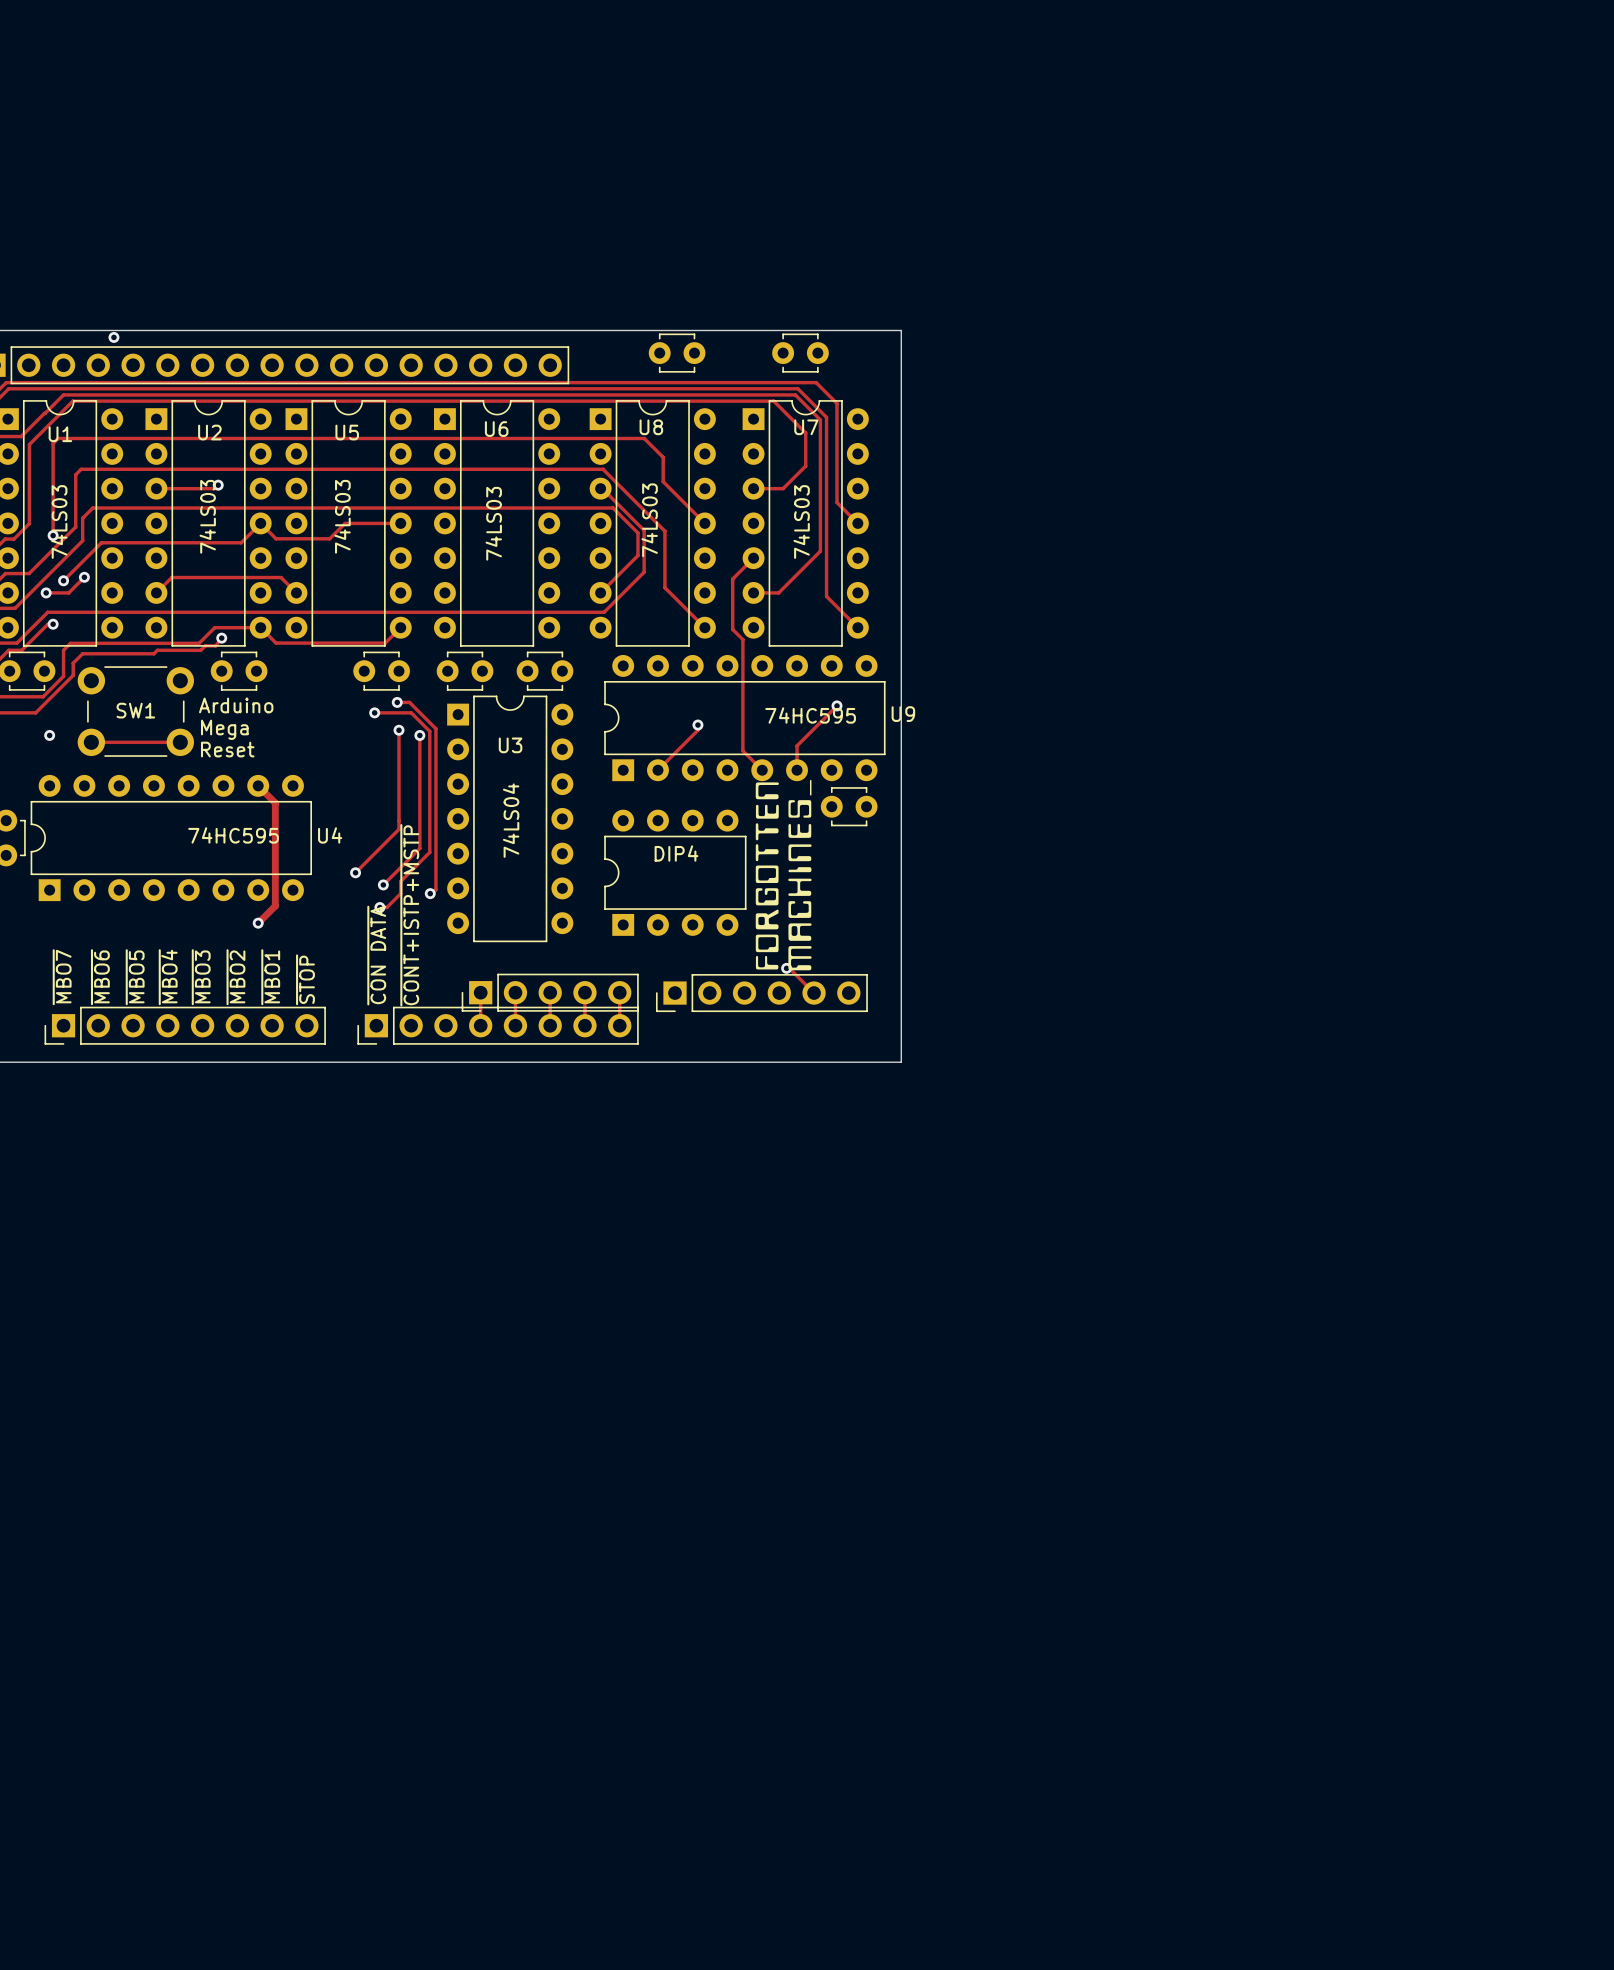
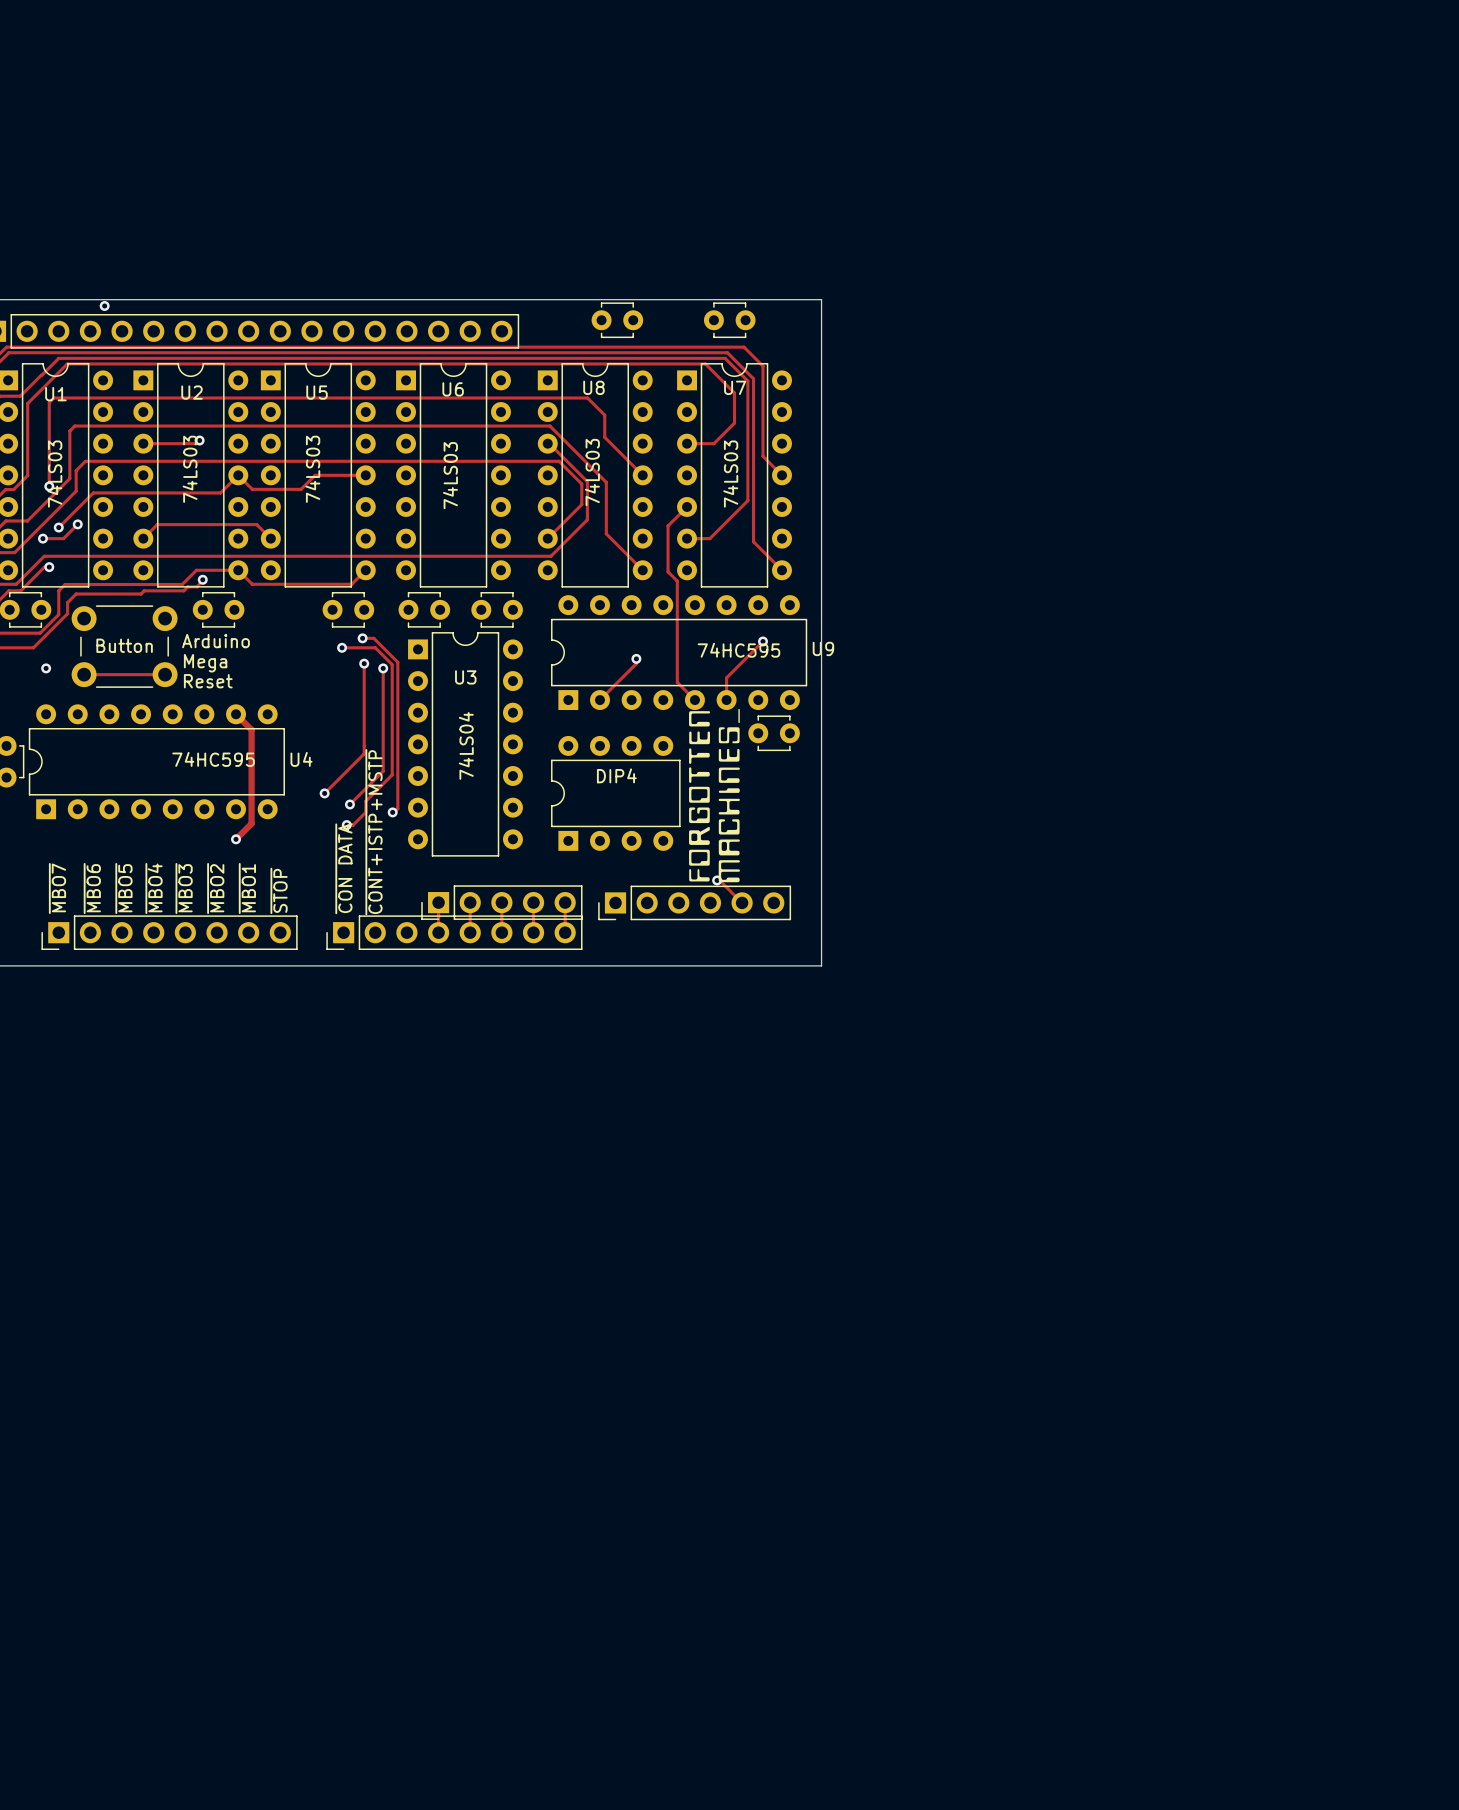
SW1 name: SW1 (135, 710) -> Button (124, 645)

